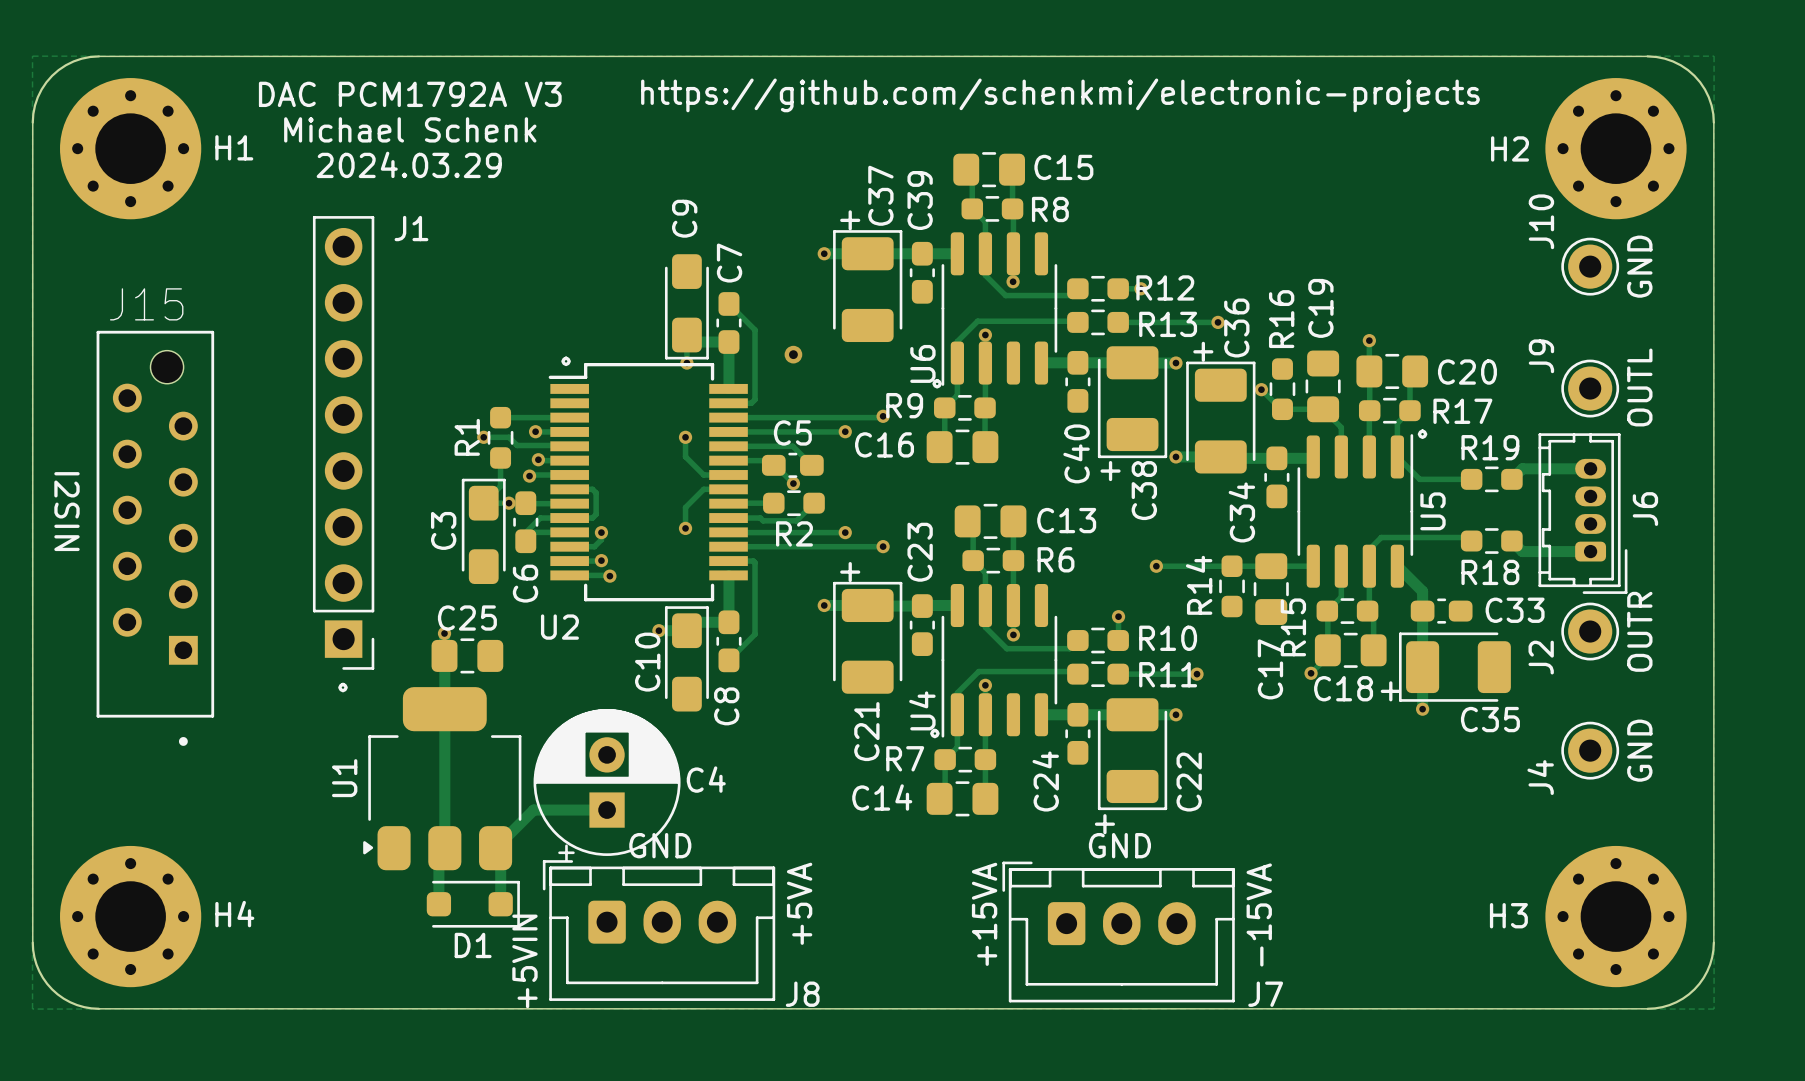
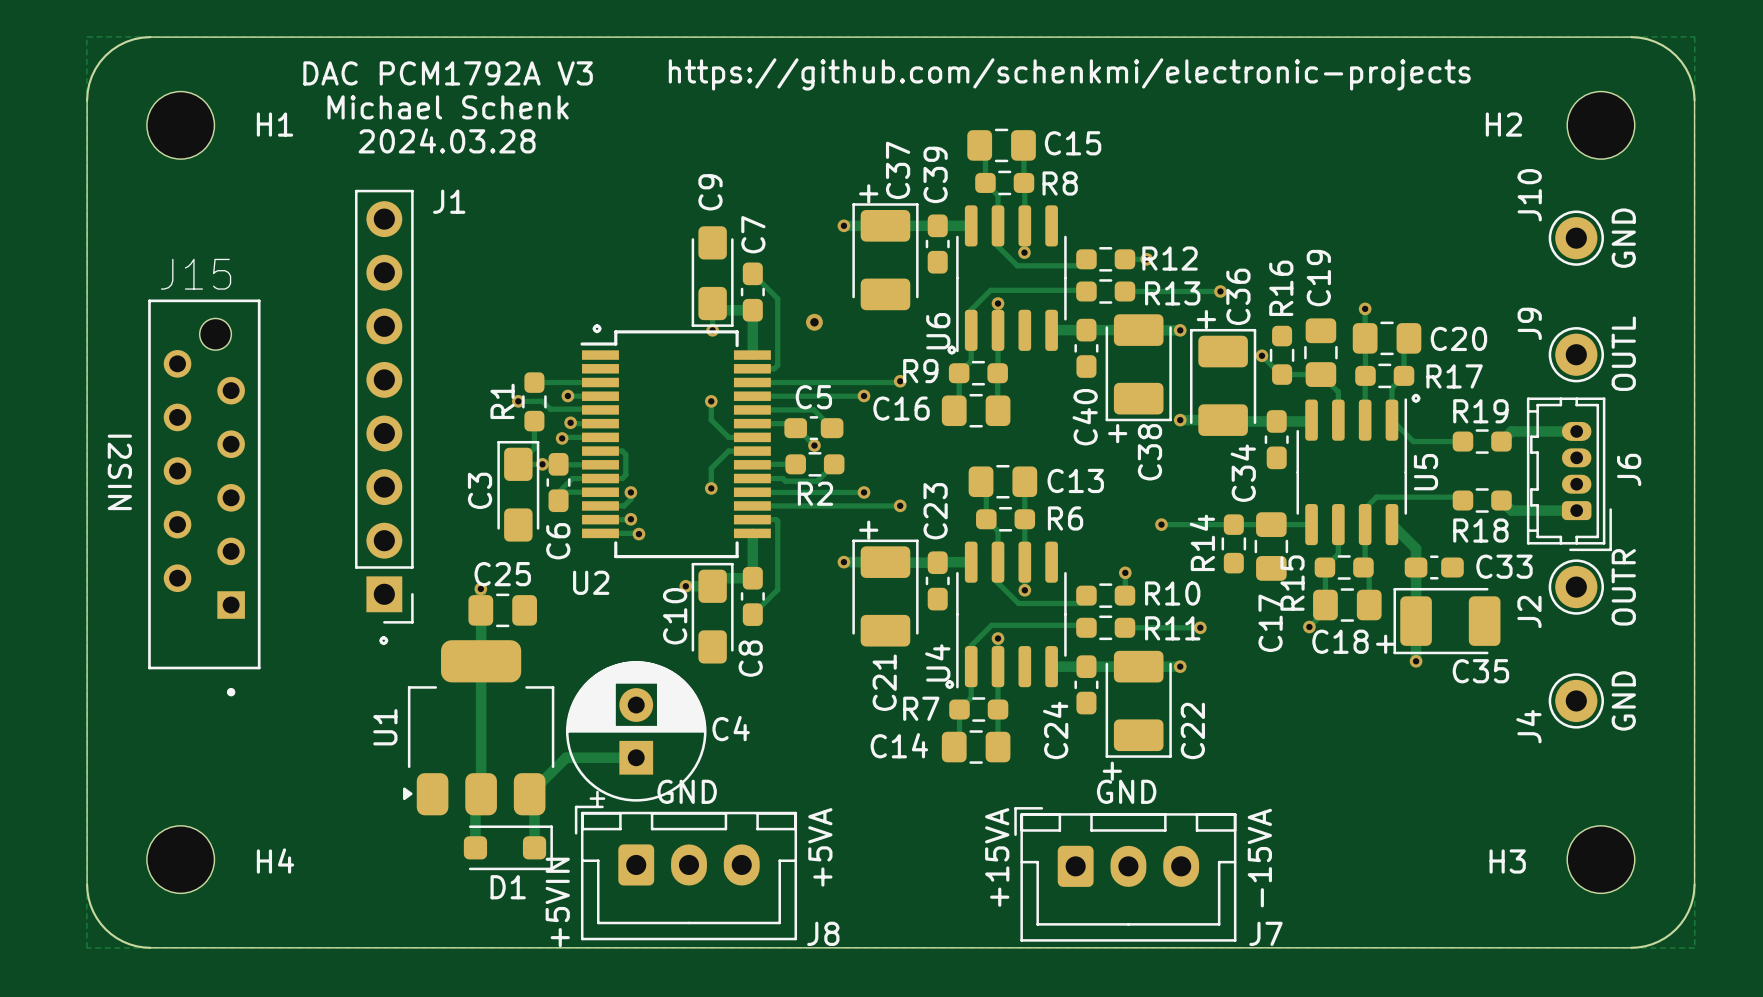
H1 footprint: [60, 78, 202, 220] -> [146, 91, 215, 160]
H2 footprint: [1545, 78, 1687, 220] -> [1567, 91, 1635, 160]
text: 2024.03.29 (409, 164) -> 2024.03.28 (447, 140)
H4 footprint: [60, 845, 202, 988] -> [146, 825, 215, 894]
H3 footprint: [1545, 845, 1687, 988] -> [1567, 825, 1635, 894]

